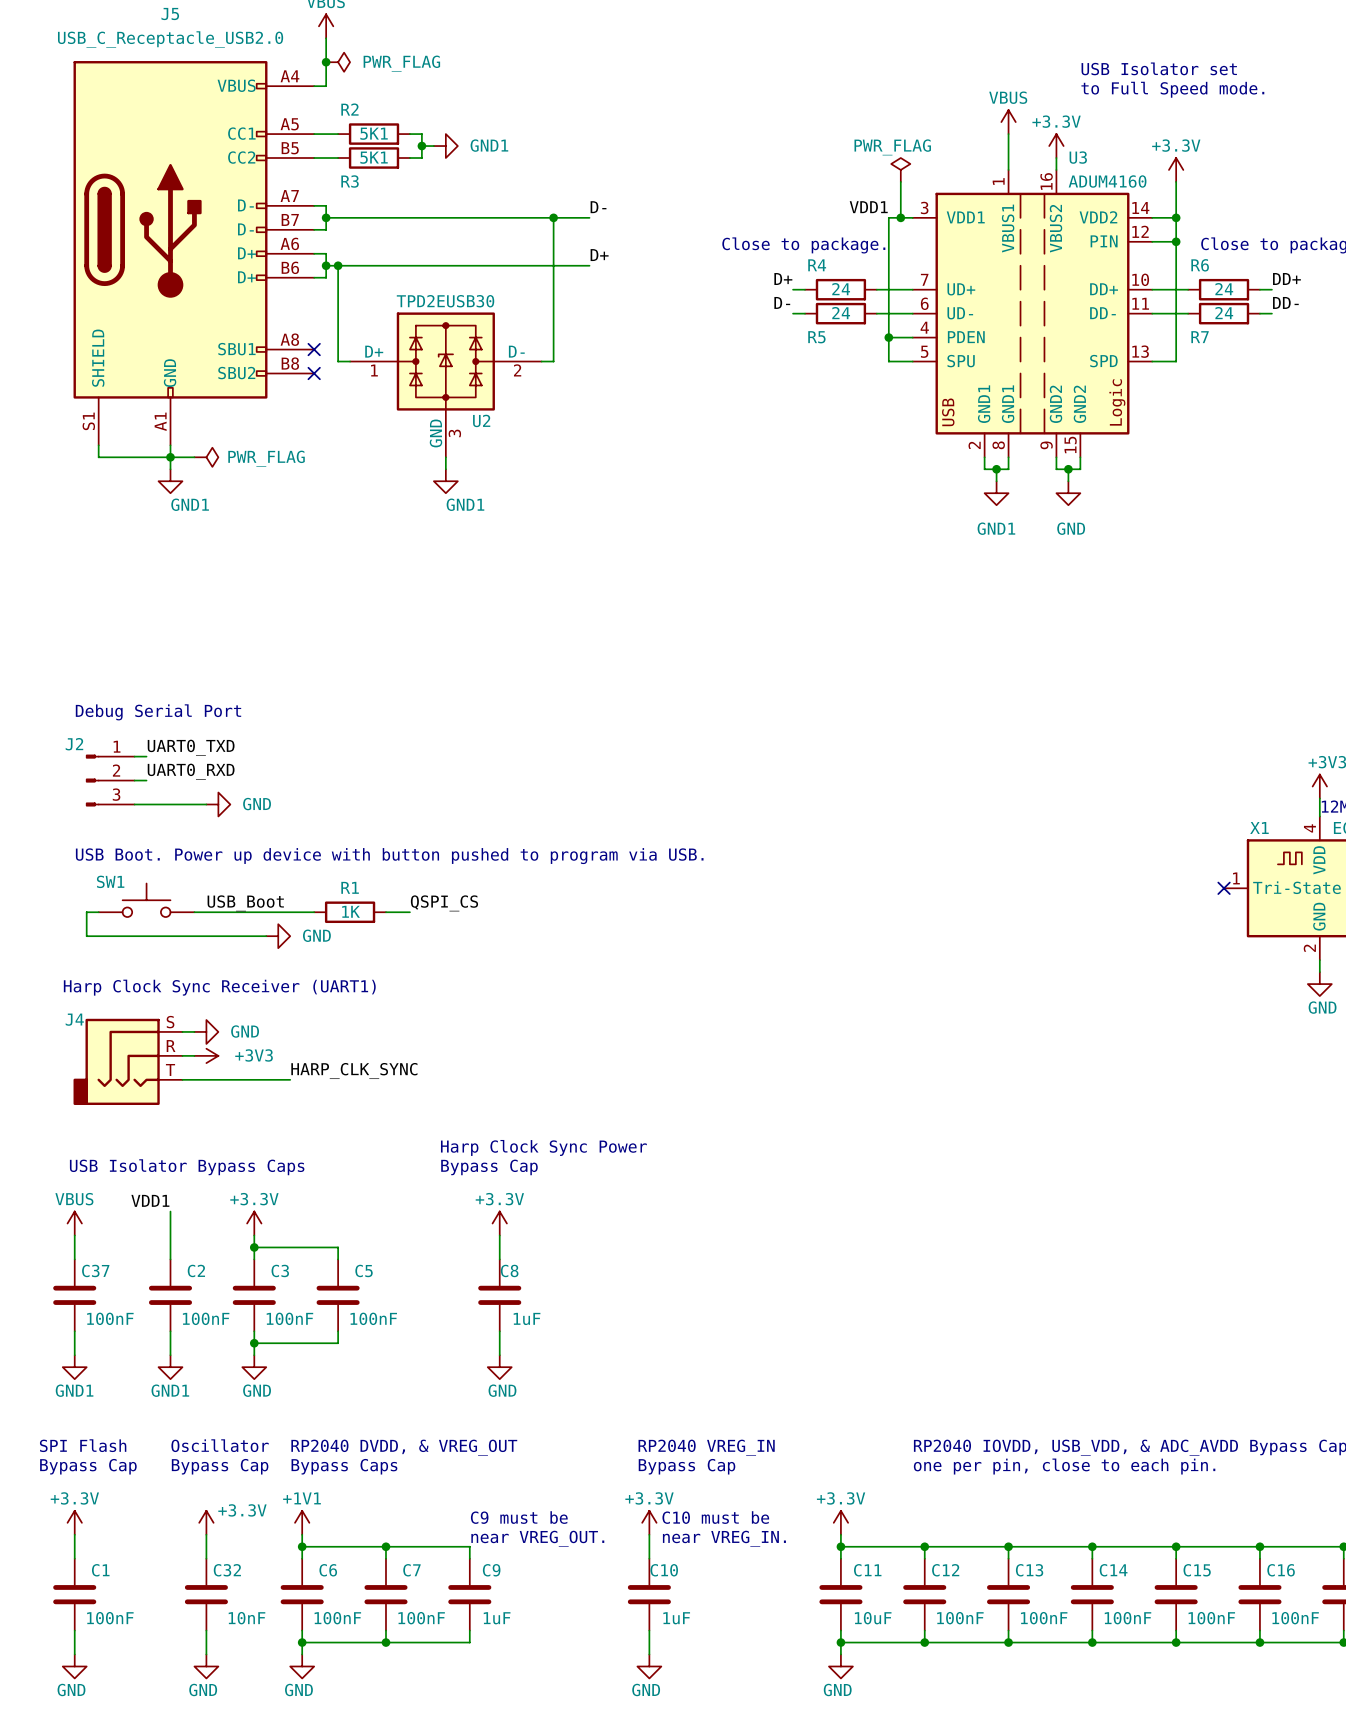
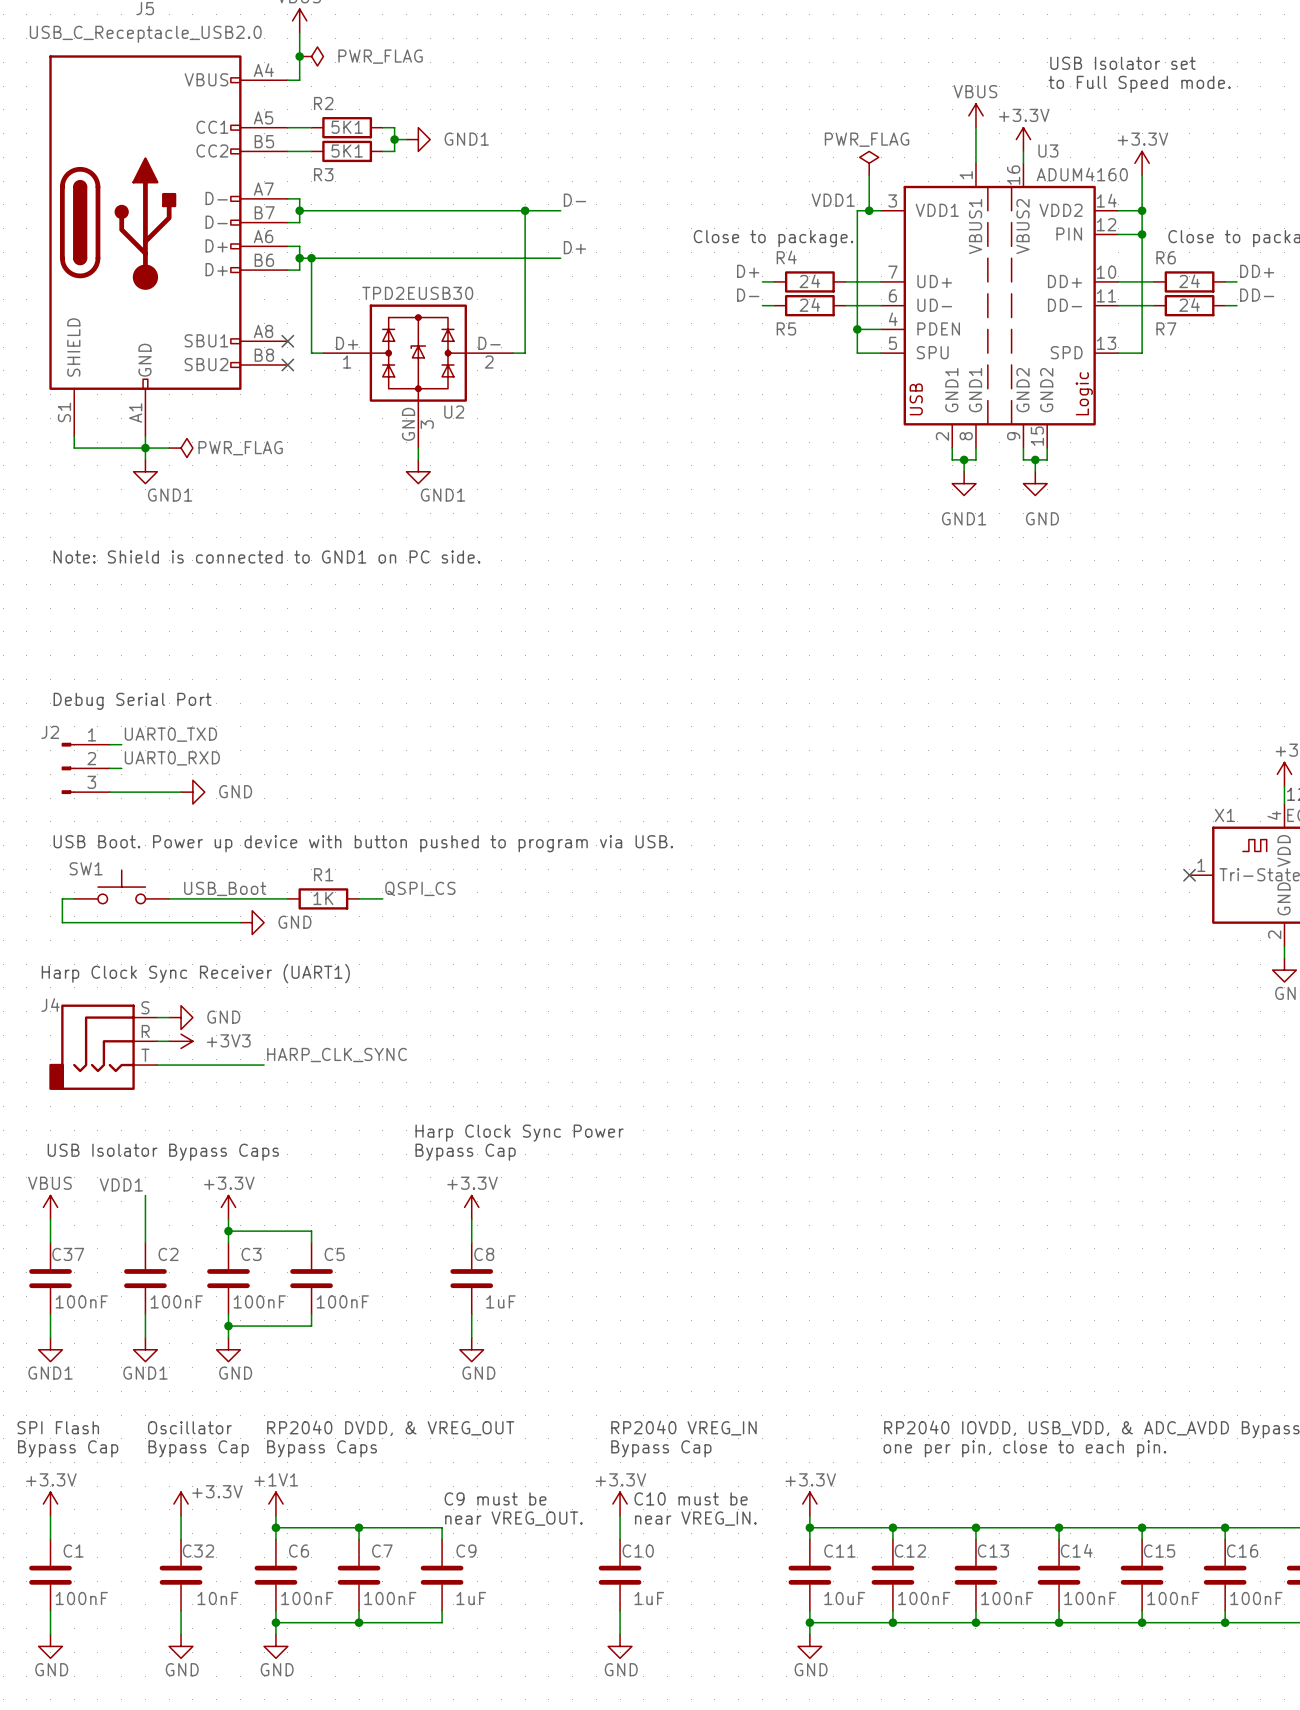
text: none -> Note: Shield is connected to GND1 on PC side. (267, 556)

